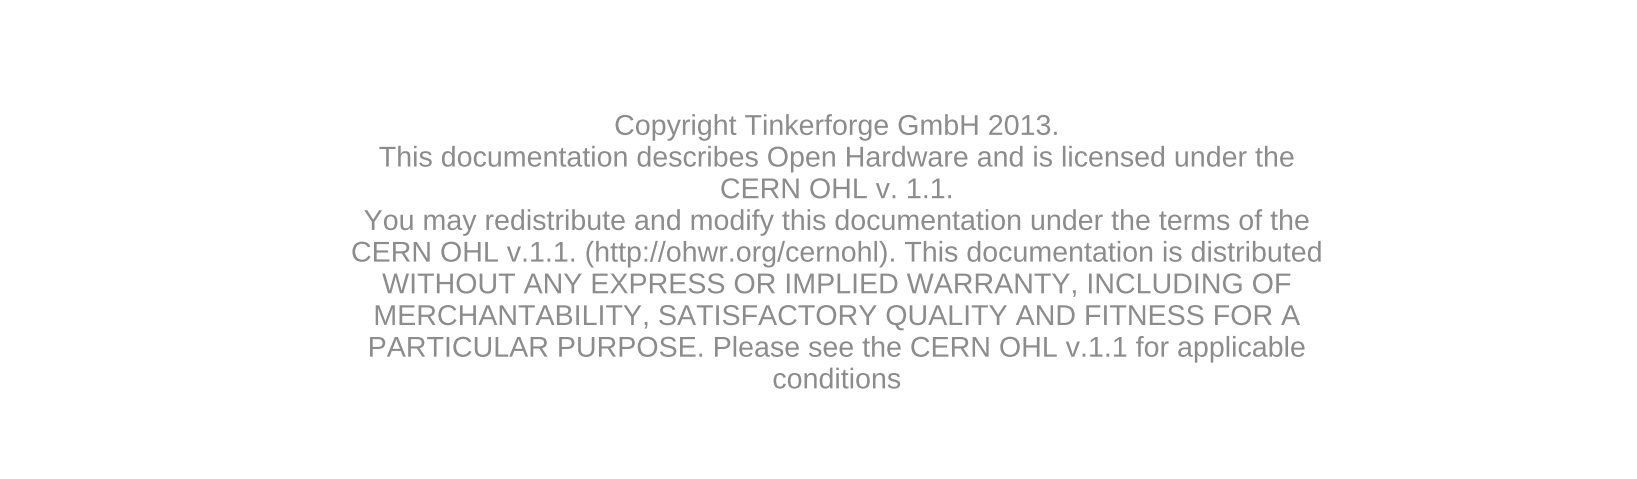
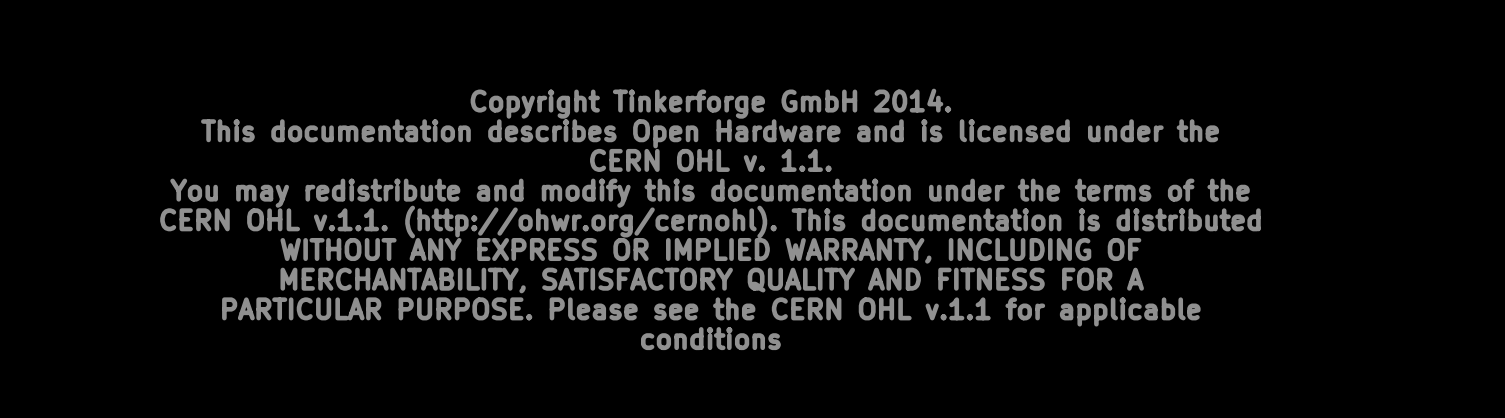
text: Copyright Tinkerforge GmbH 2013. (836, 127) -> Copyright Tinkerforge GmbH 2014. (710, 103)

